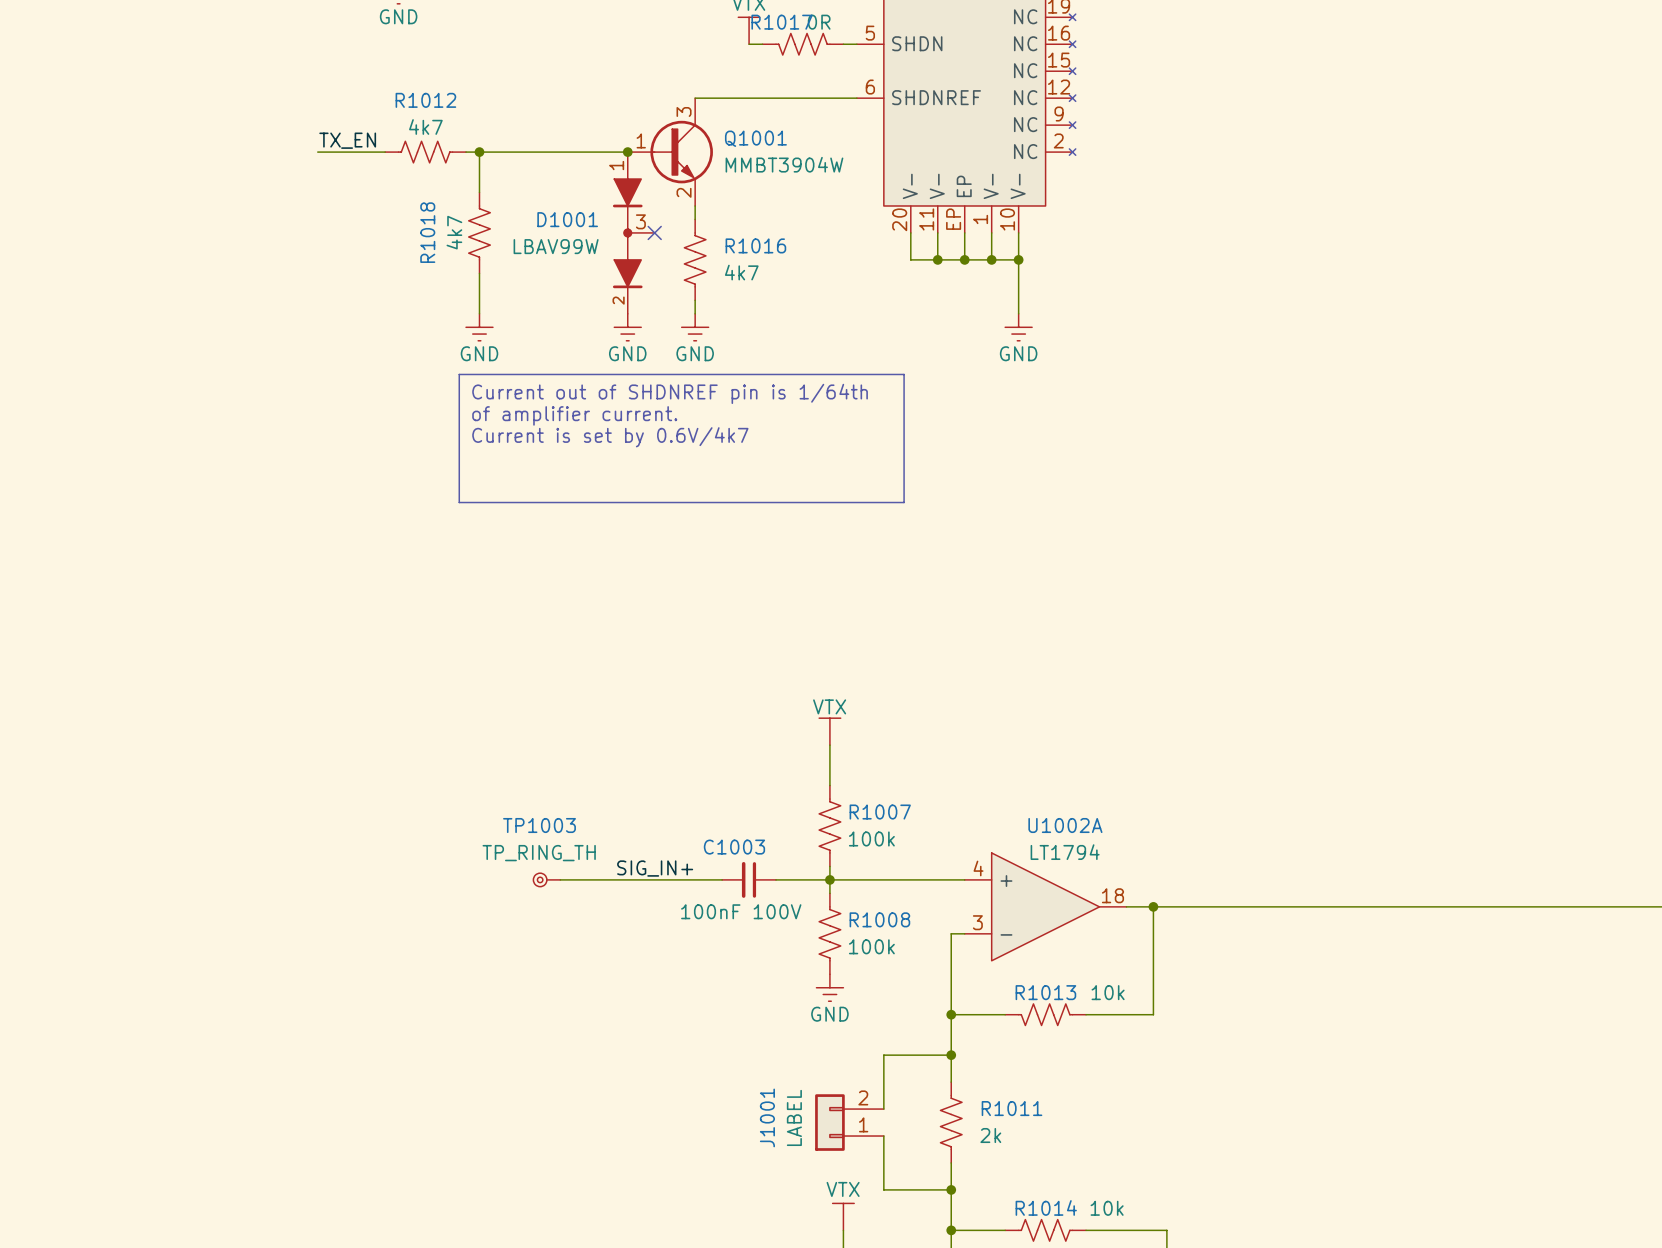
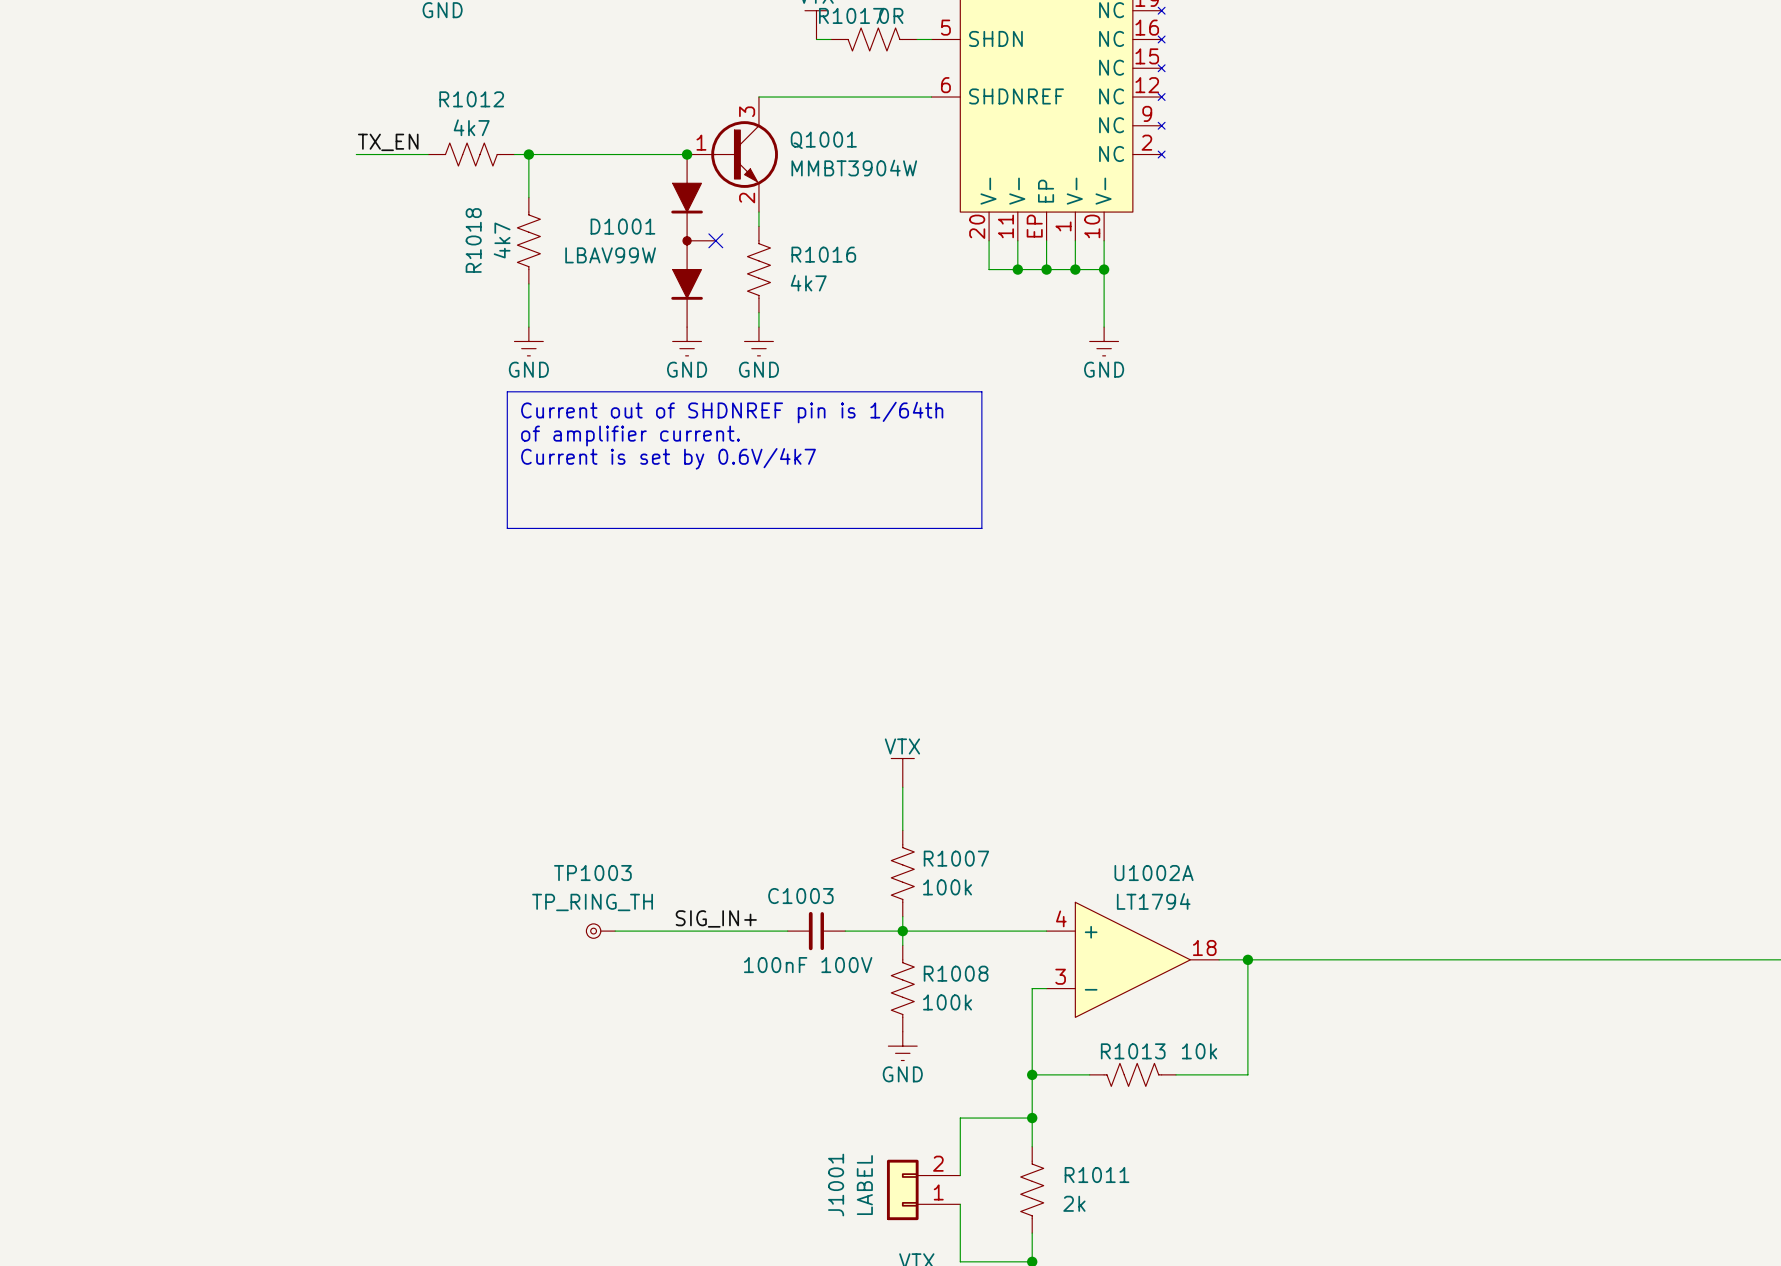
D1001 pin number: 1 (616, 165) -> none
D1001 pin number: 3 (640, 221) -> none
D1001 pin number: 2 (618, 300) -> none

